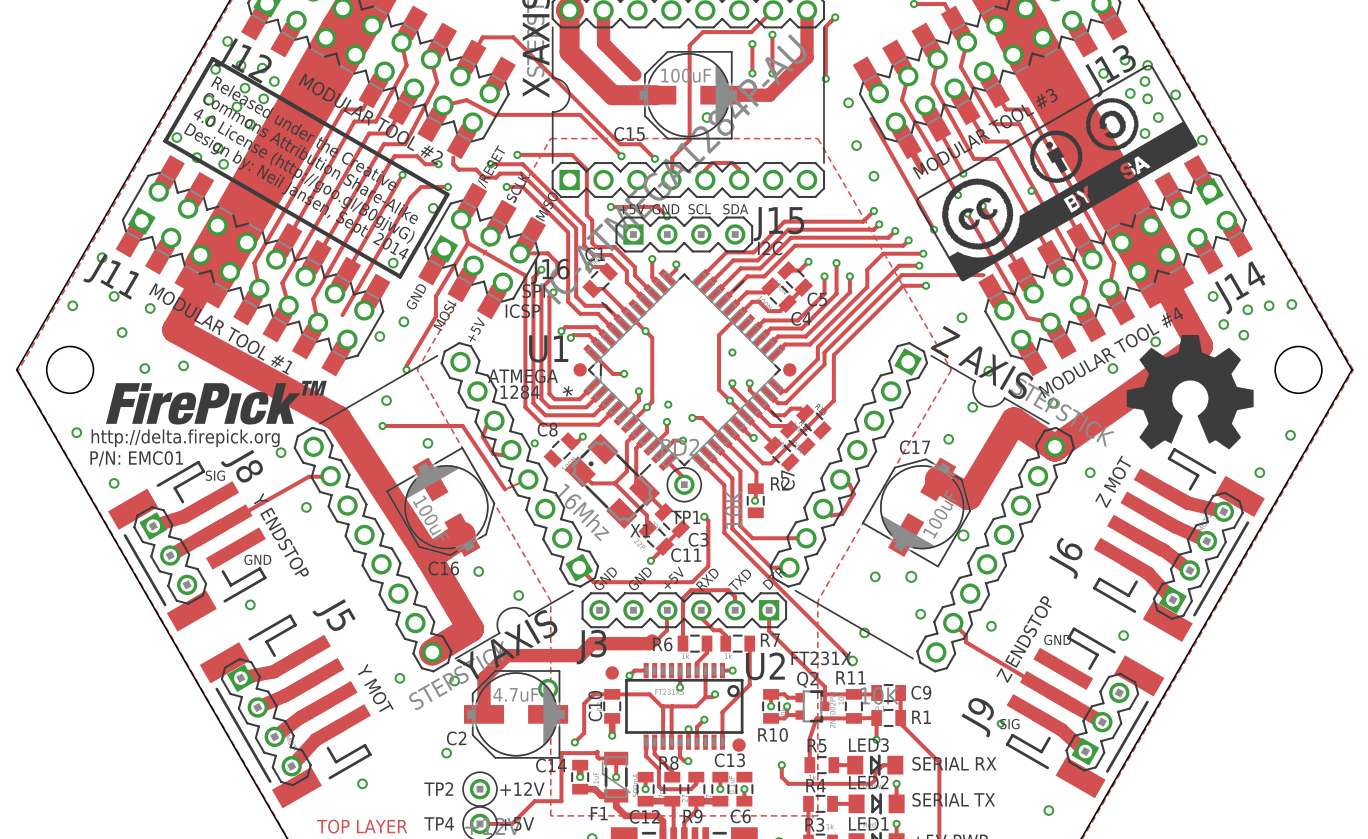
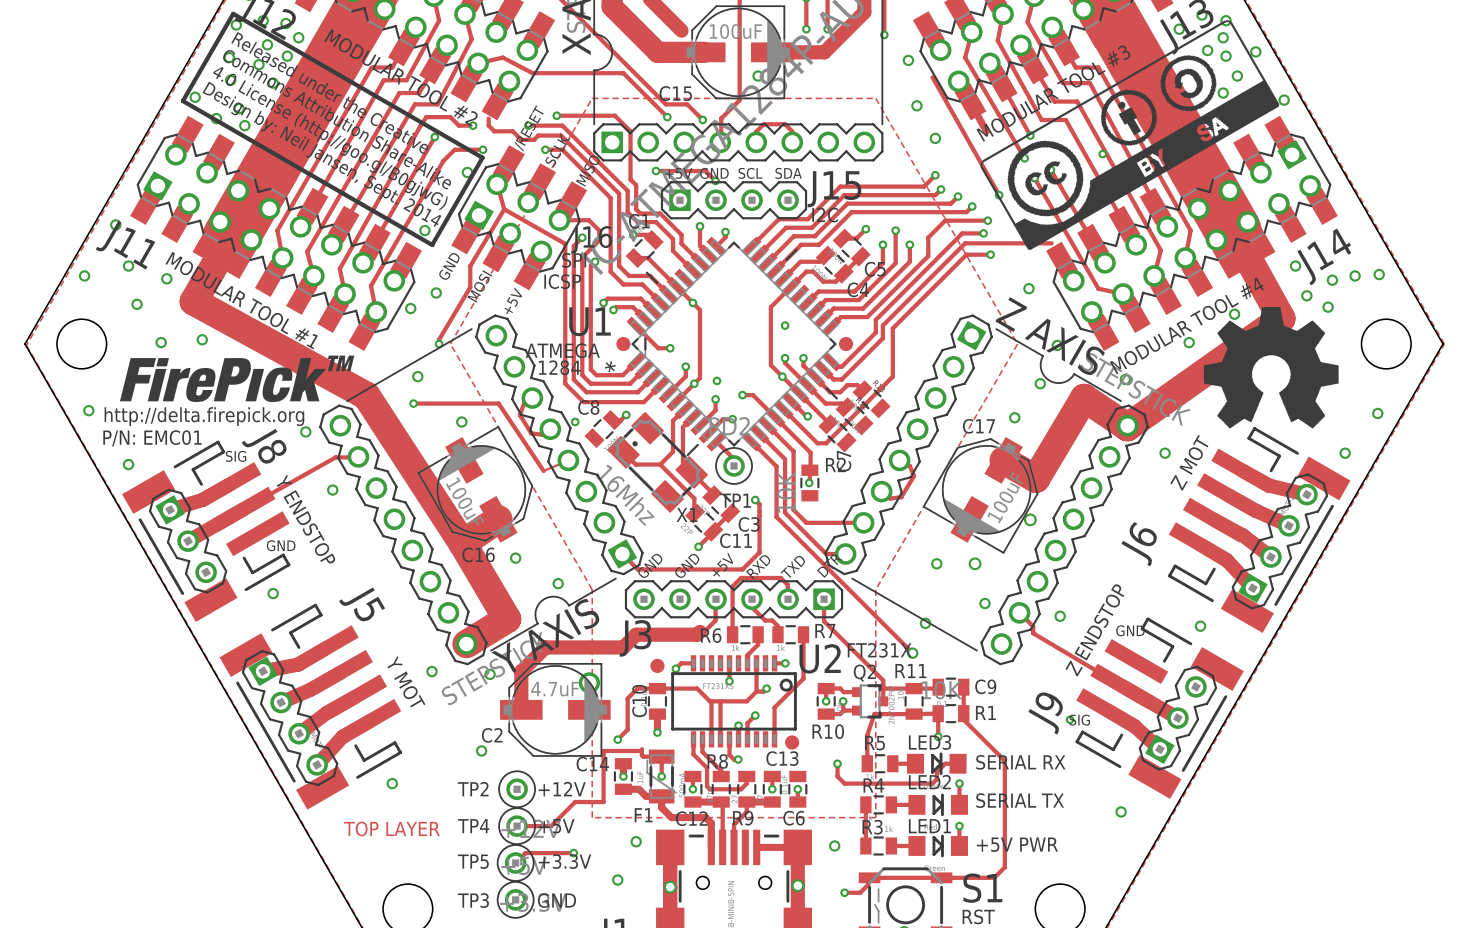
track: none -> (371, 285) (376, 311)

